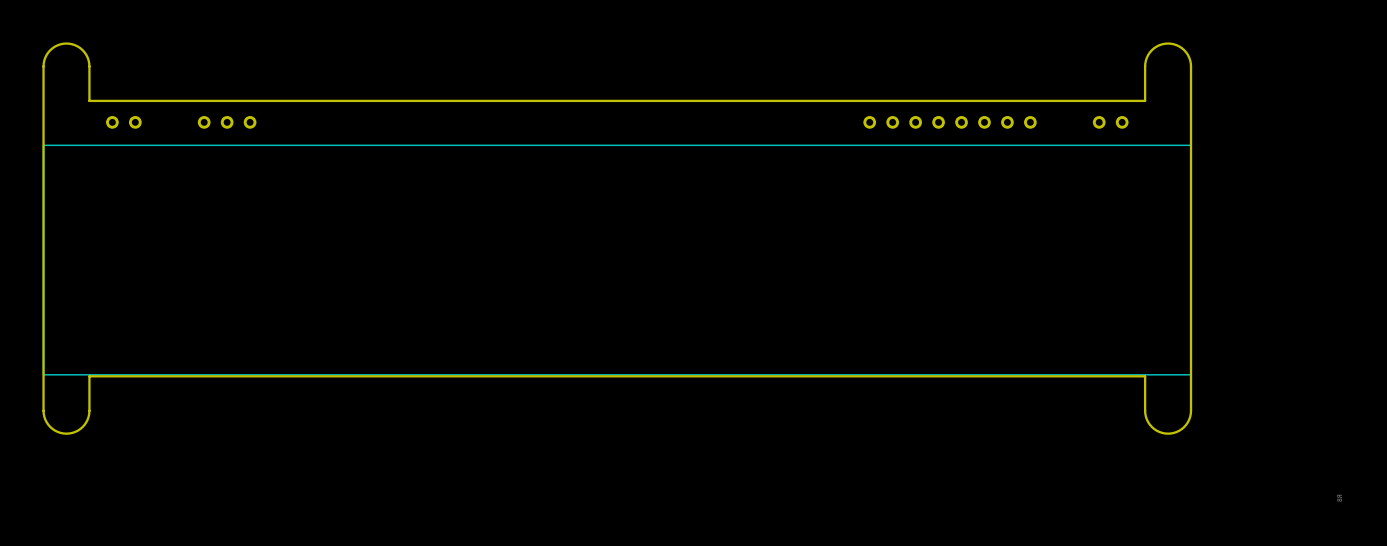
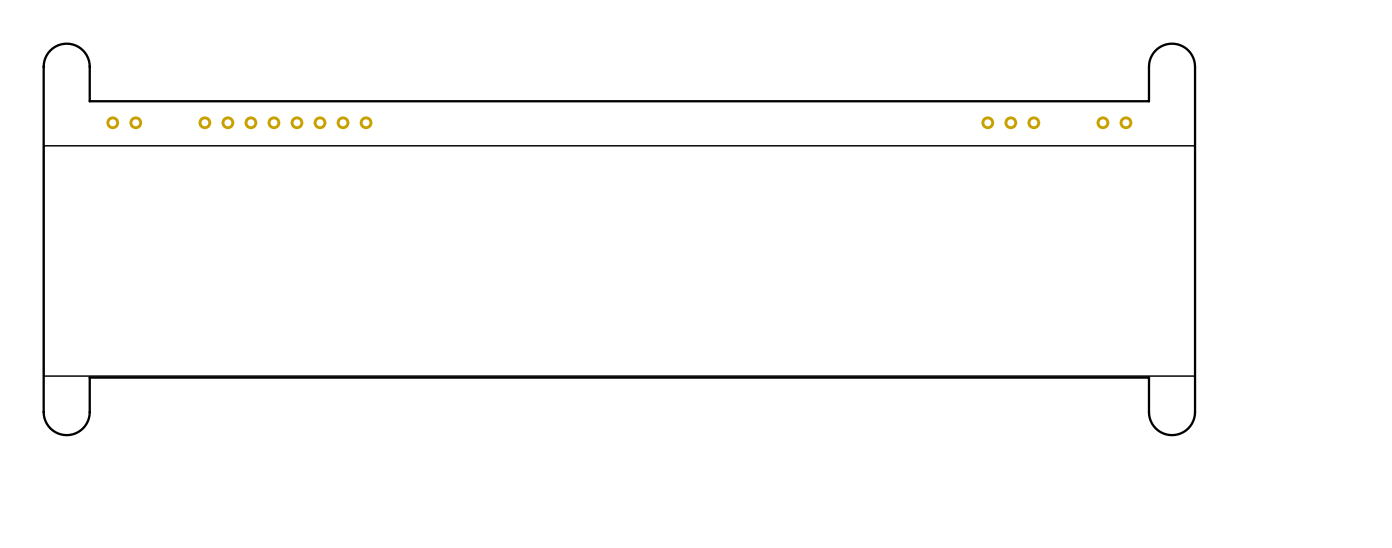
part footprint: [42, 116, 1192, 376] -> [42, 116, 1196, 377]
part: (1339, 498) -> none

